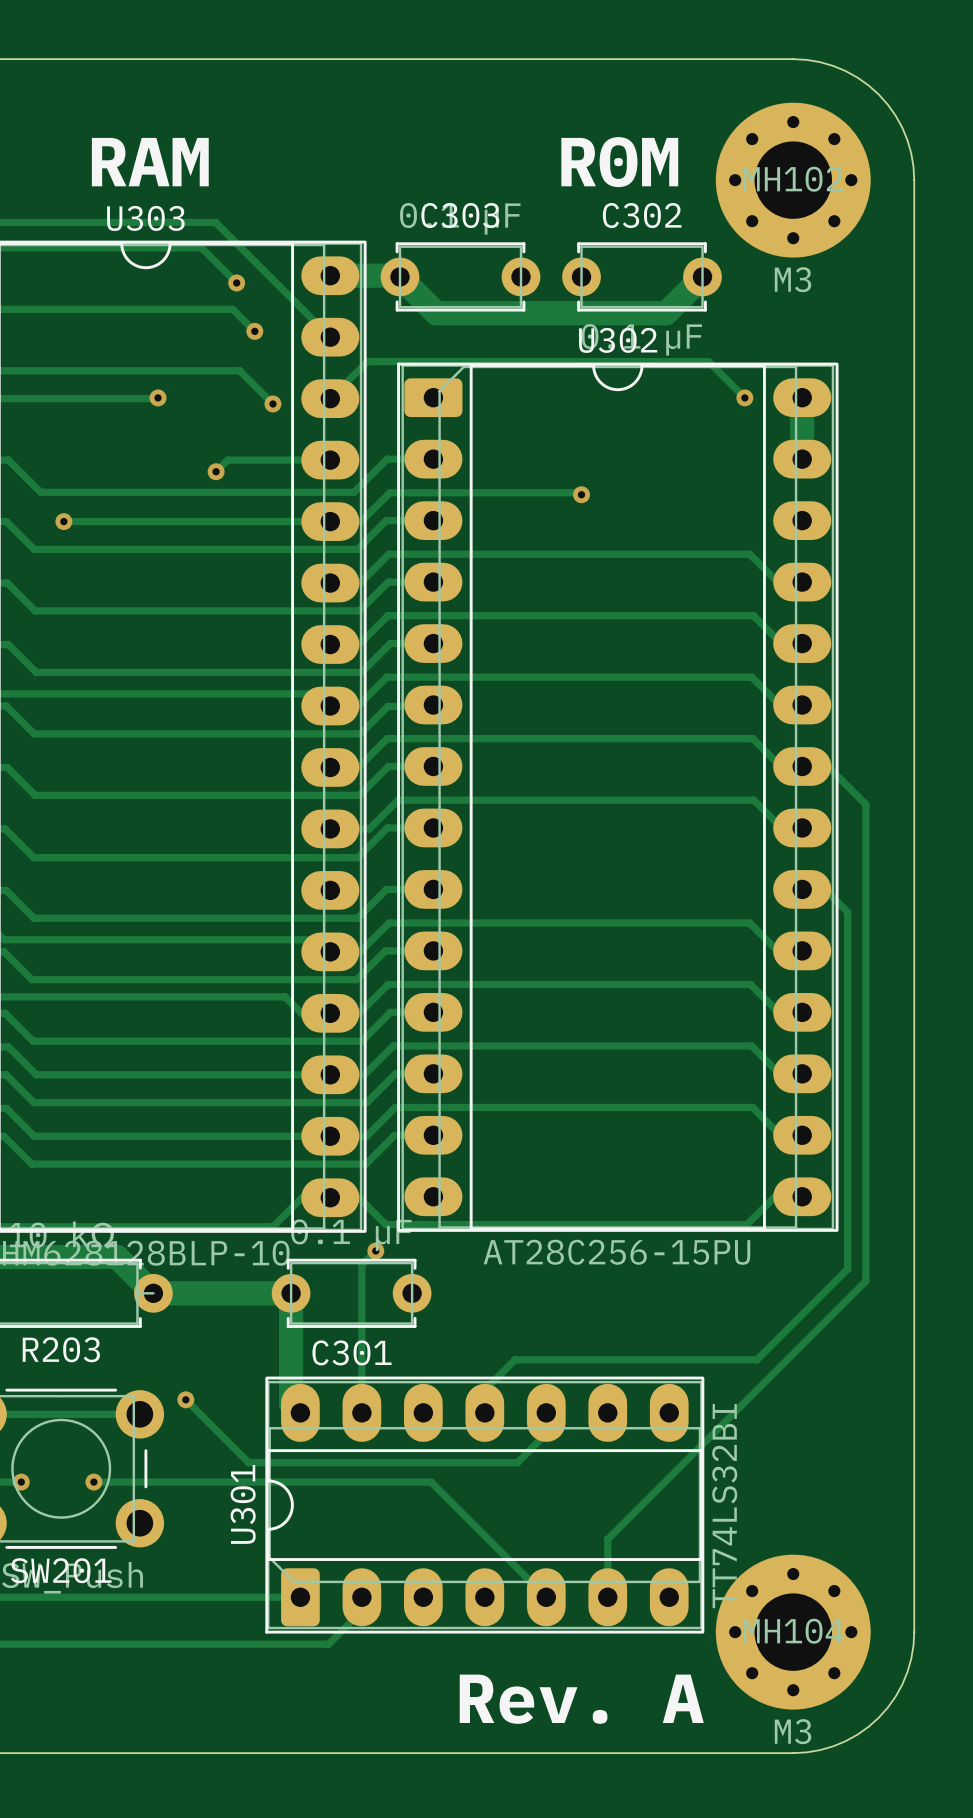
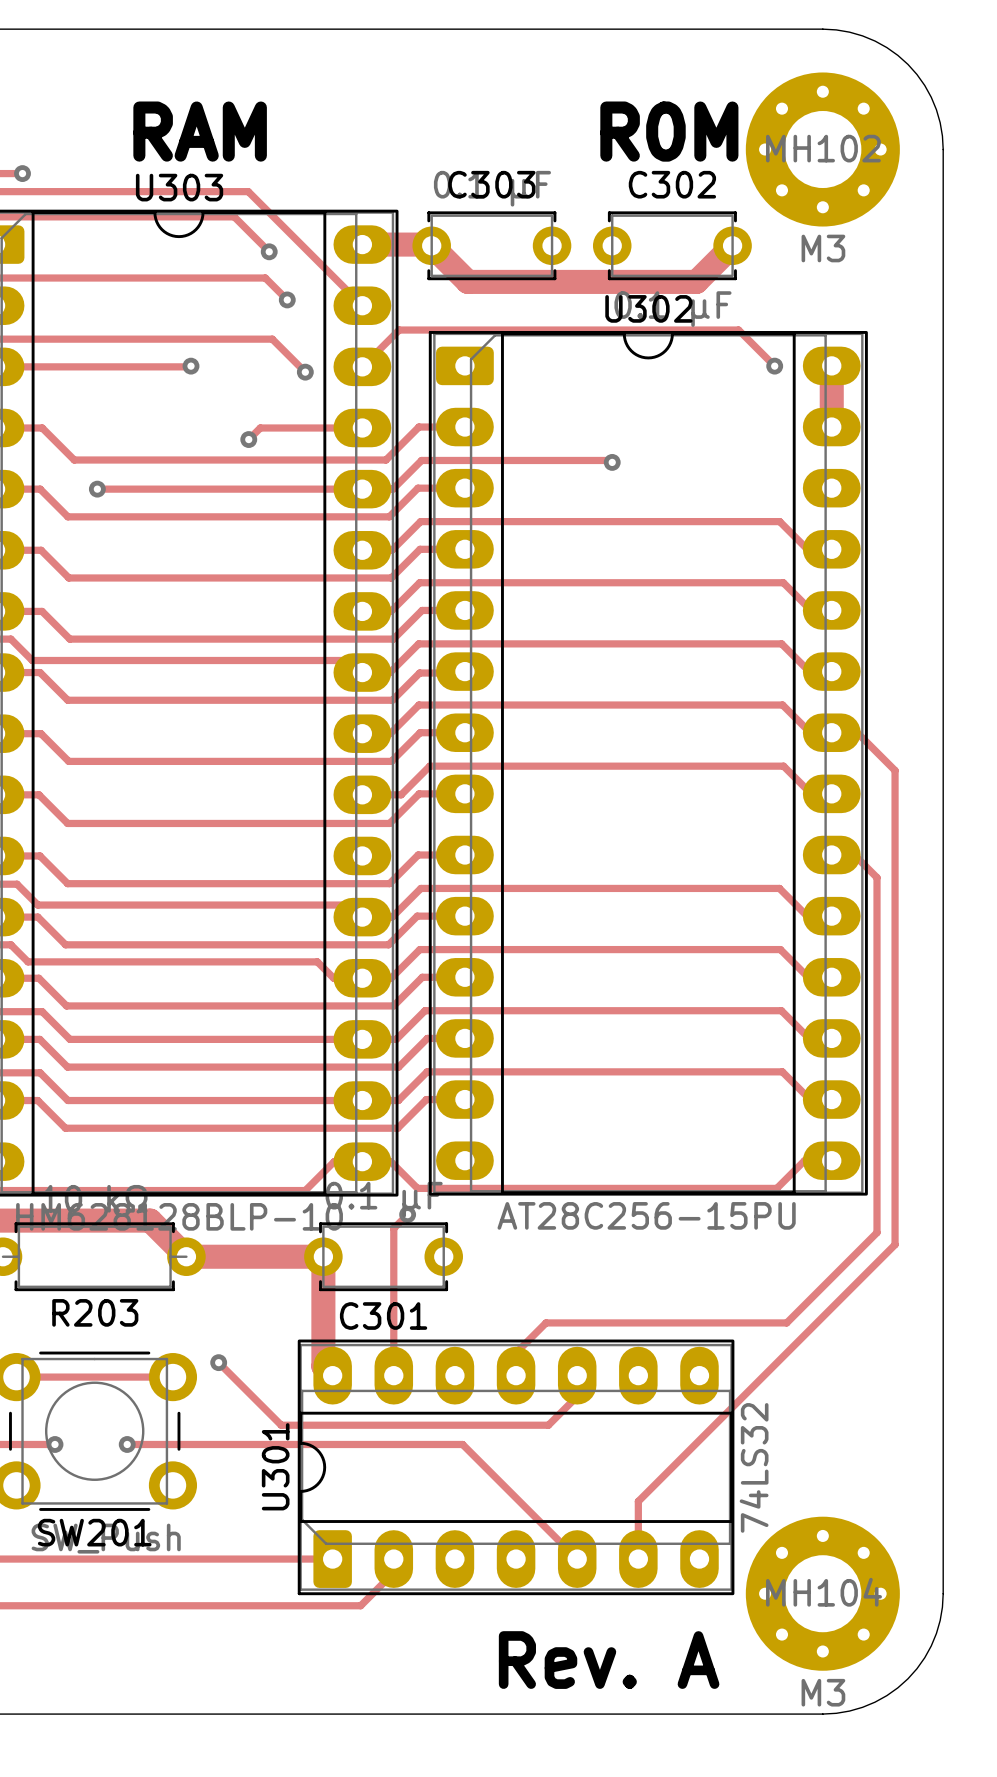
U301 value: TT74LS32BI (724, 1506) -> 74LS32 (754, 1467)

